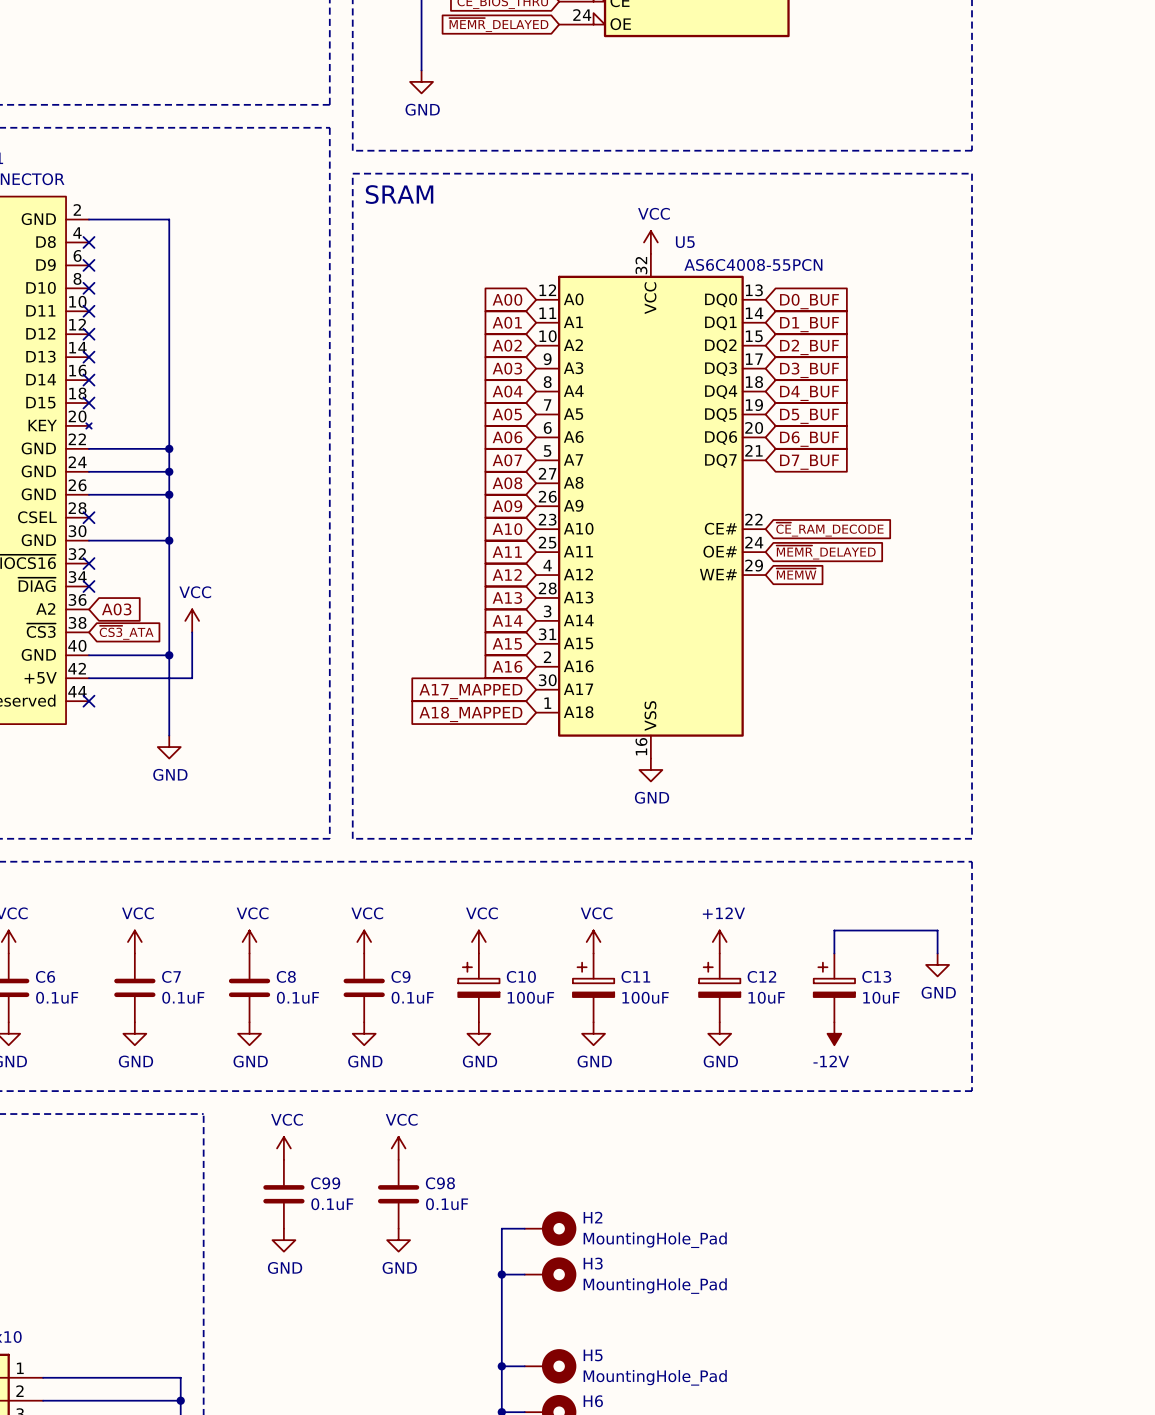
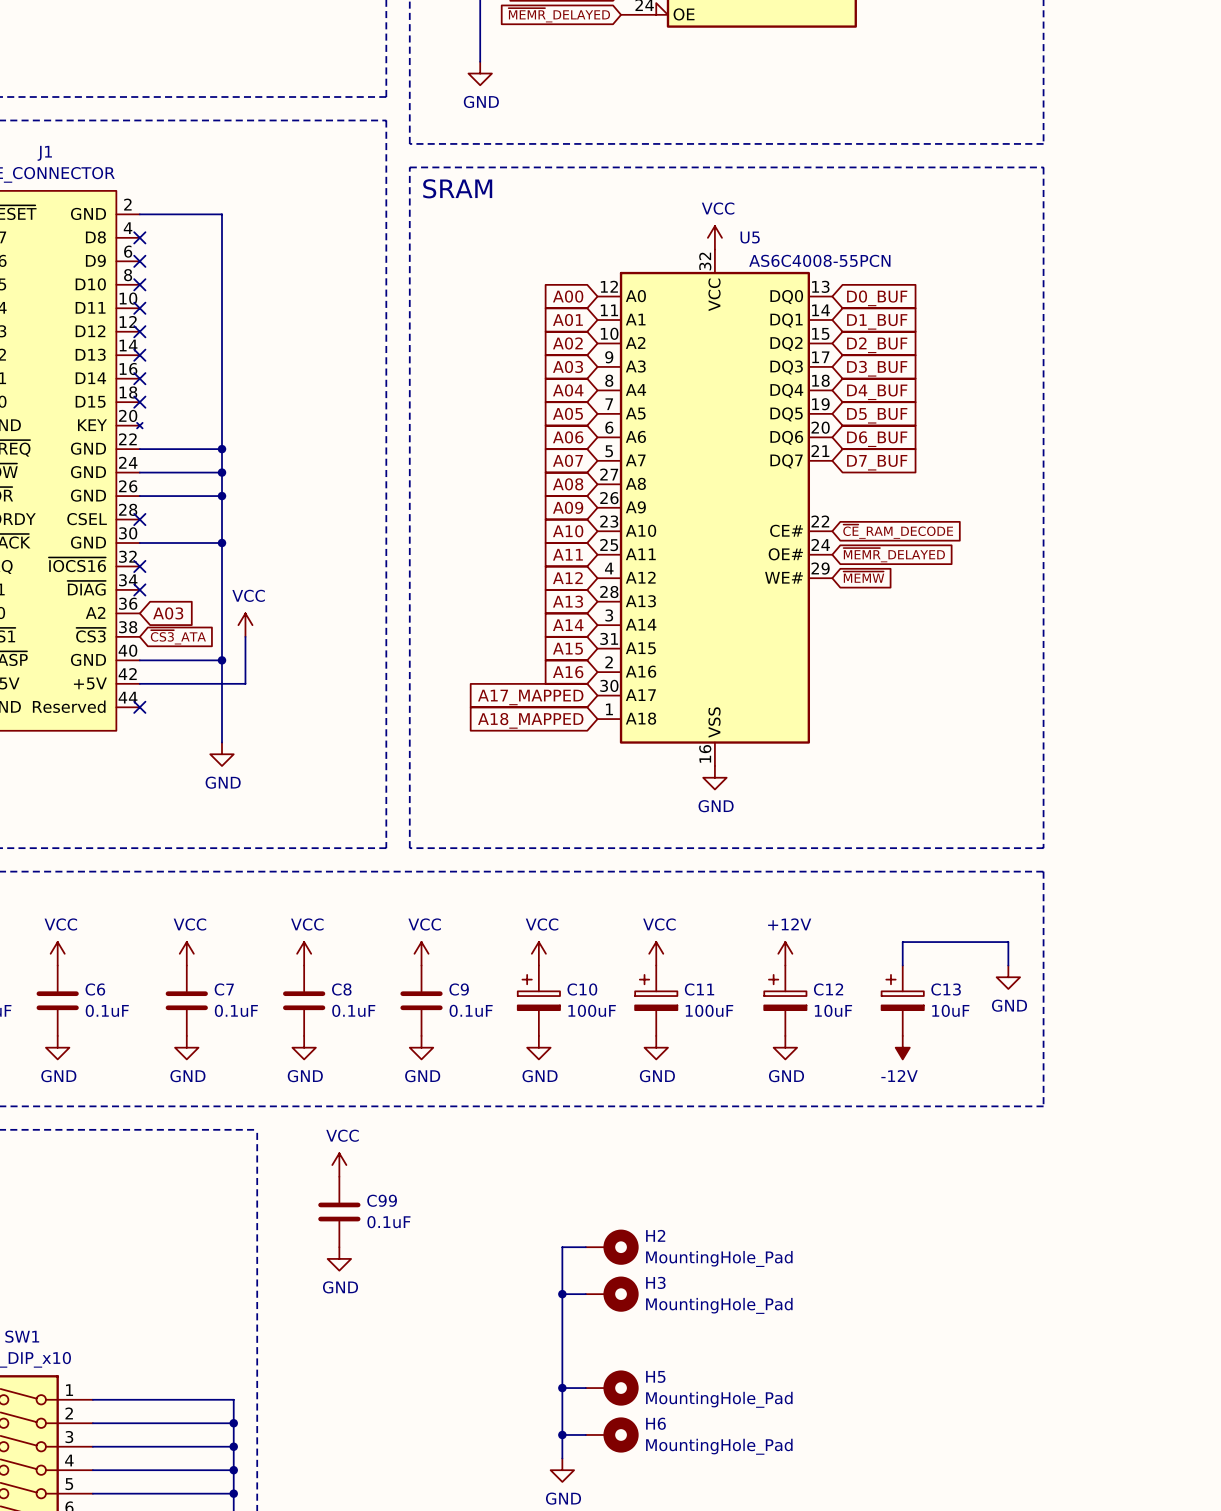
power symbol: VCC (398, 1148) -> none
C98: 0.1uF (398, 1194) -> none
power symbol: GND (398, 1240) -> none

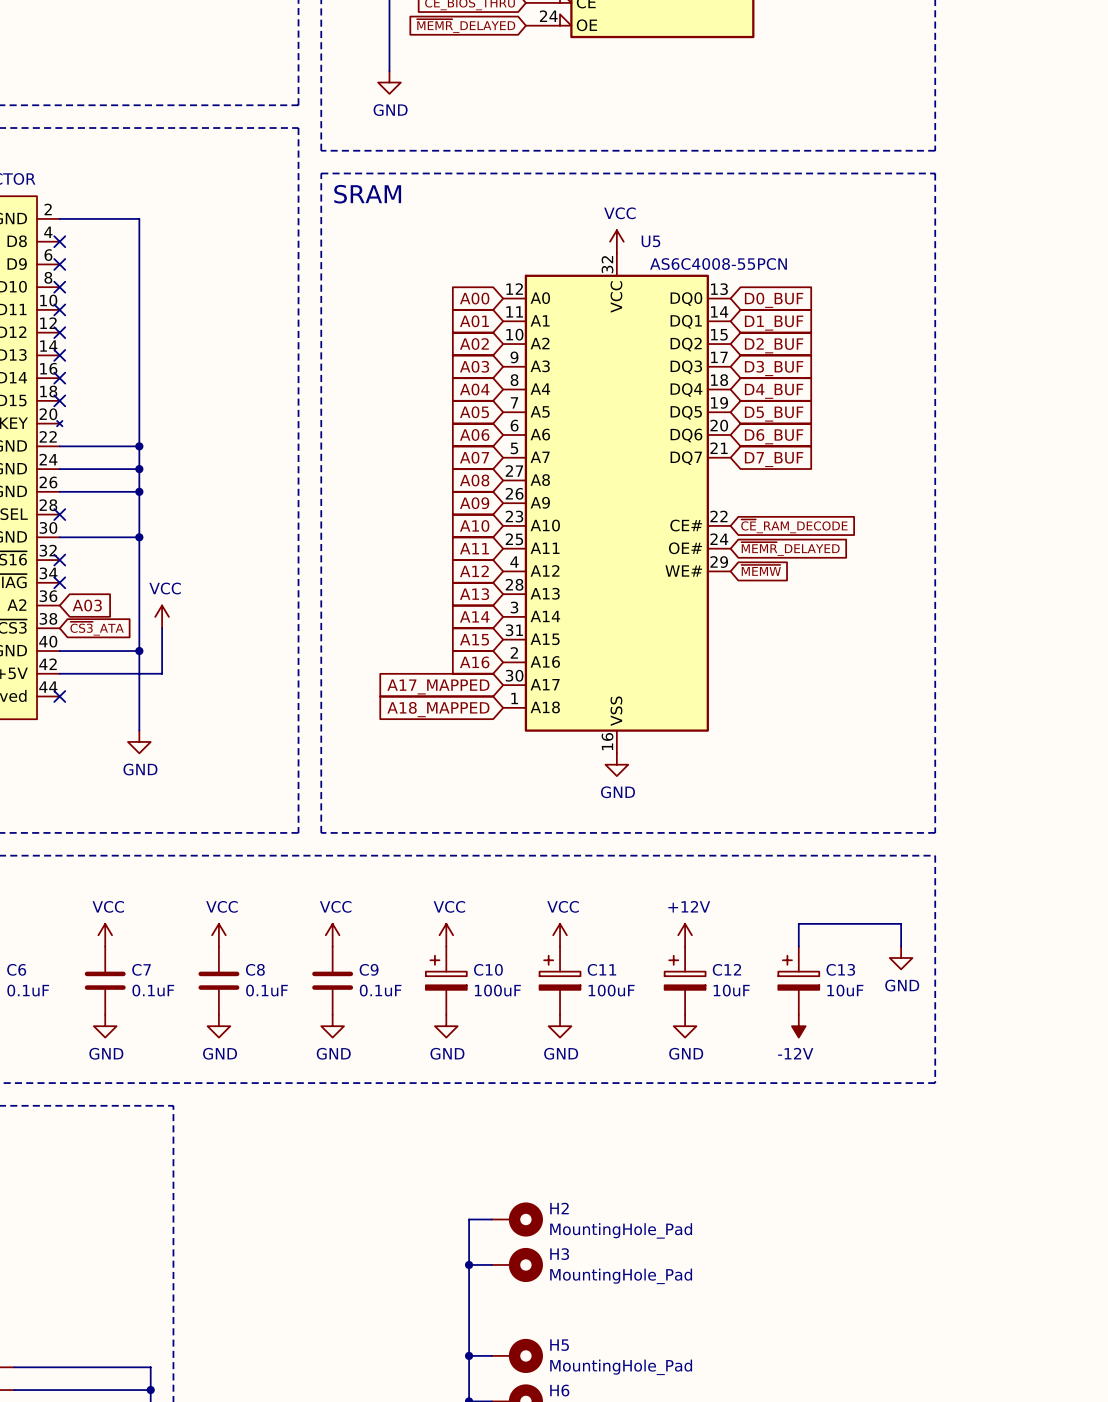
power symbol: VCC (339, 1165) -> none
C99: 0.1uF (339, 1211) -> none
power symbol: GND (339, 1258) -> none

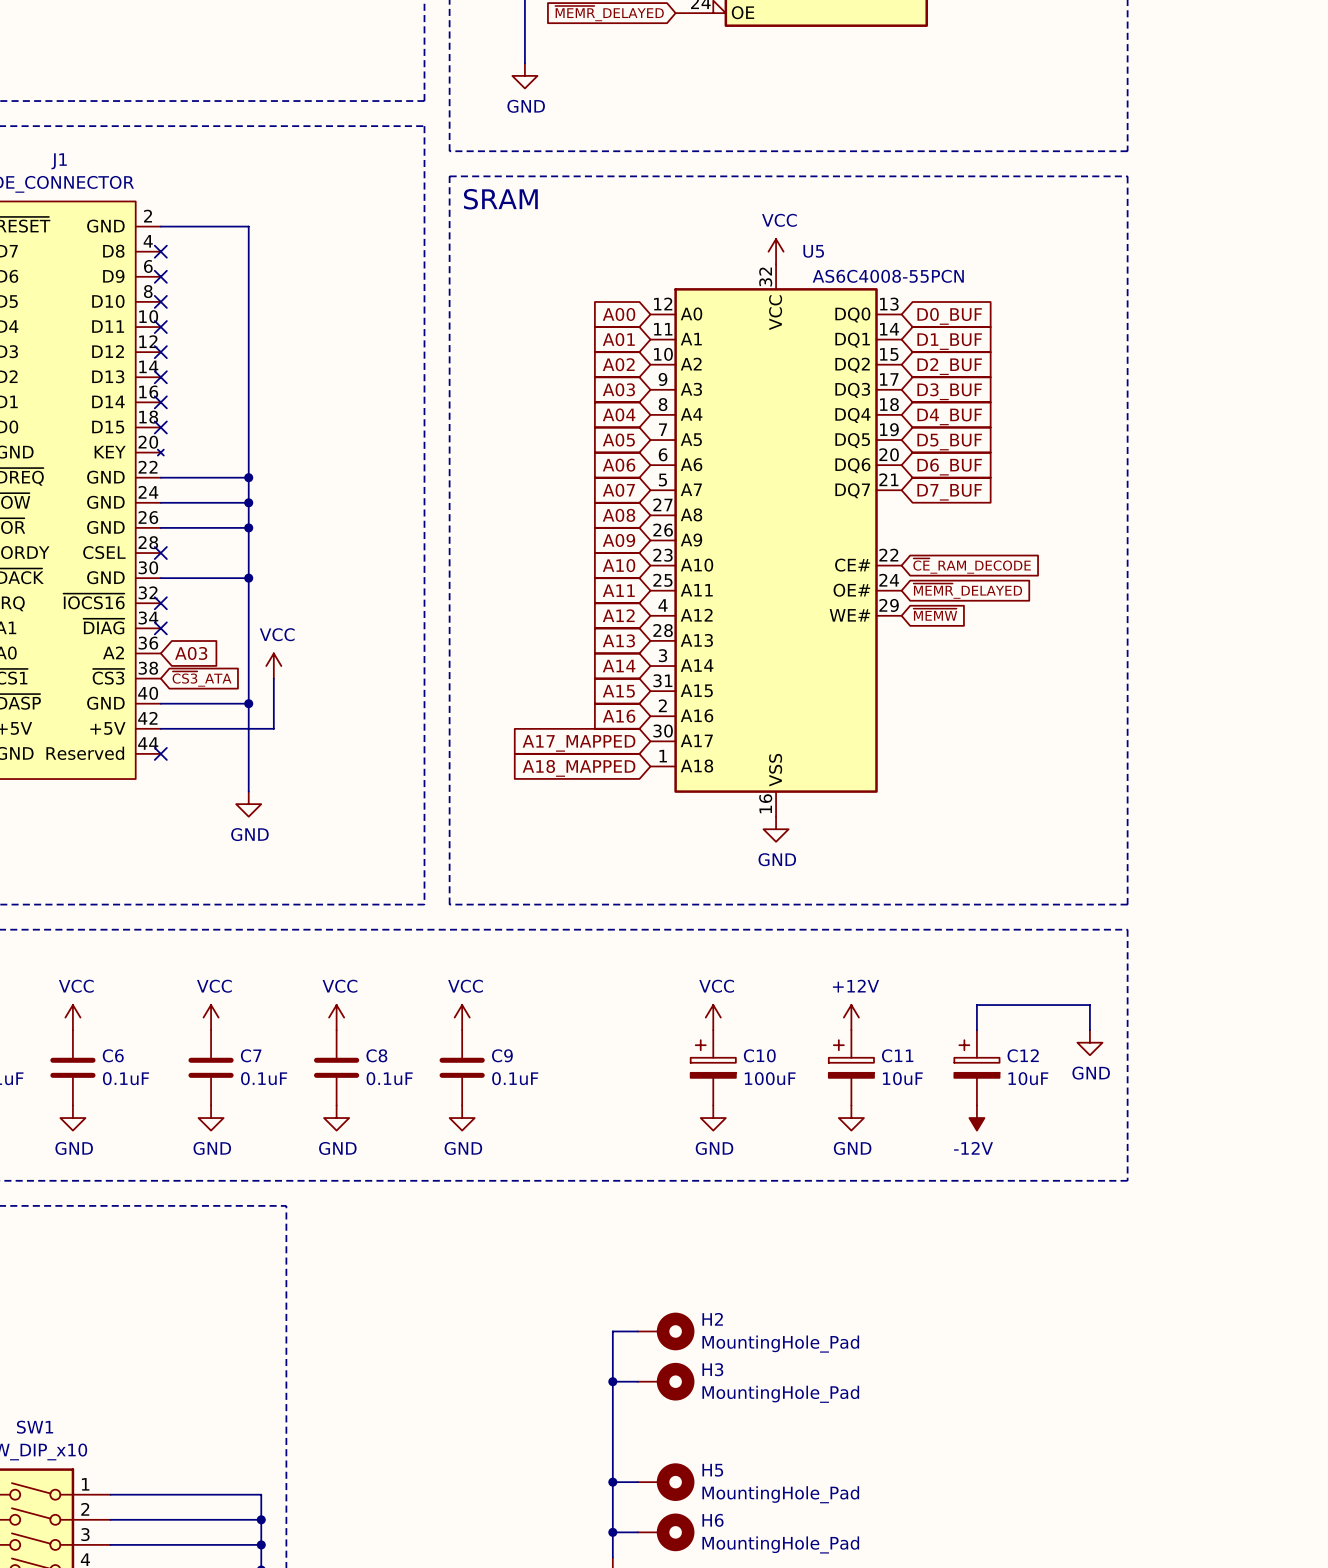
power symbol: VCC (446, 935) -> none
C11 name: C11 (601, 969) -> C10 (759, 1055)
C12 name: C12 (726, 969) -> C11 (897, 1055)
C13 name: C13 (840, 969) -> C12 (1023, 1055)
C10: 100uF (446, 980) -> none
power symbol: GND (446, 1026) -> none

